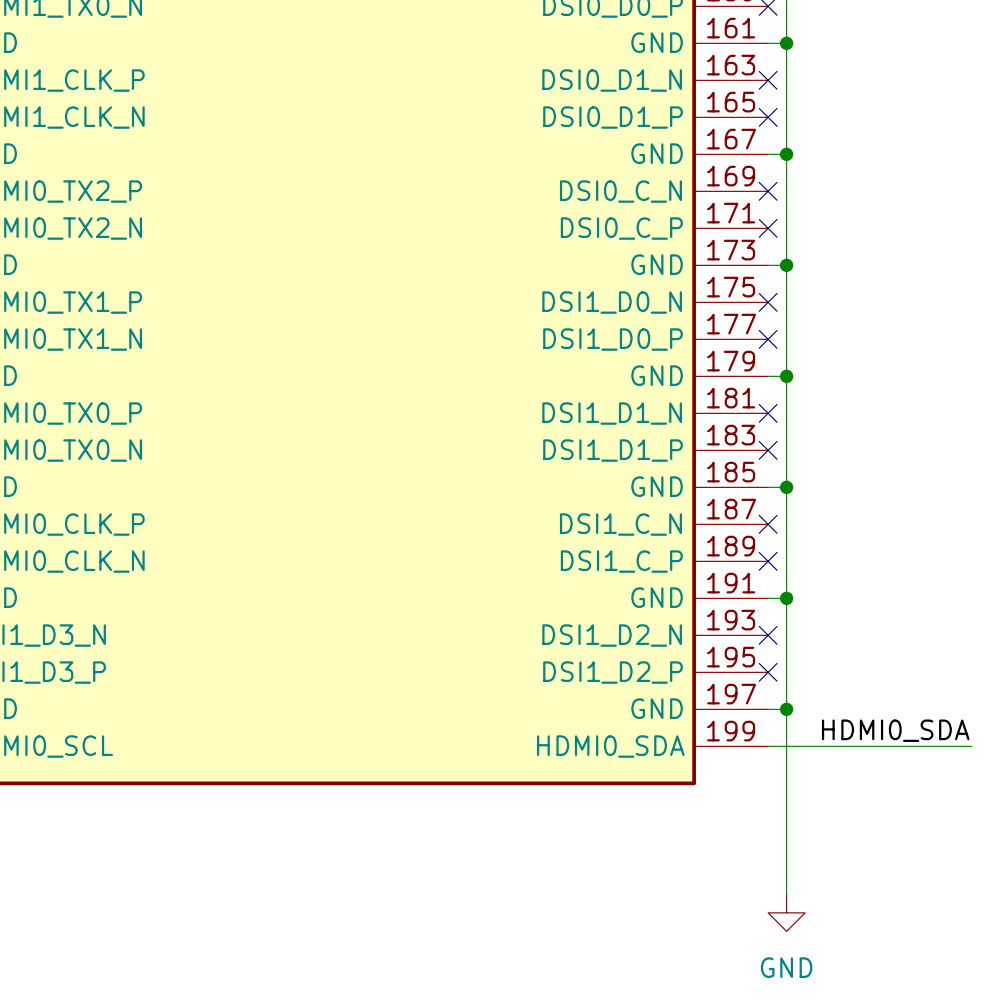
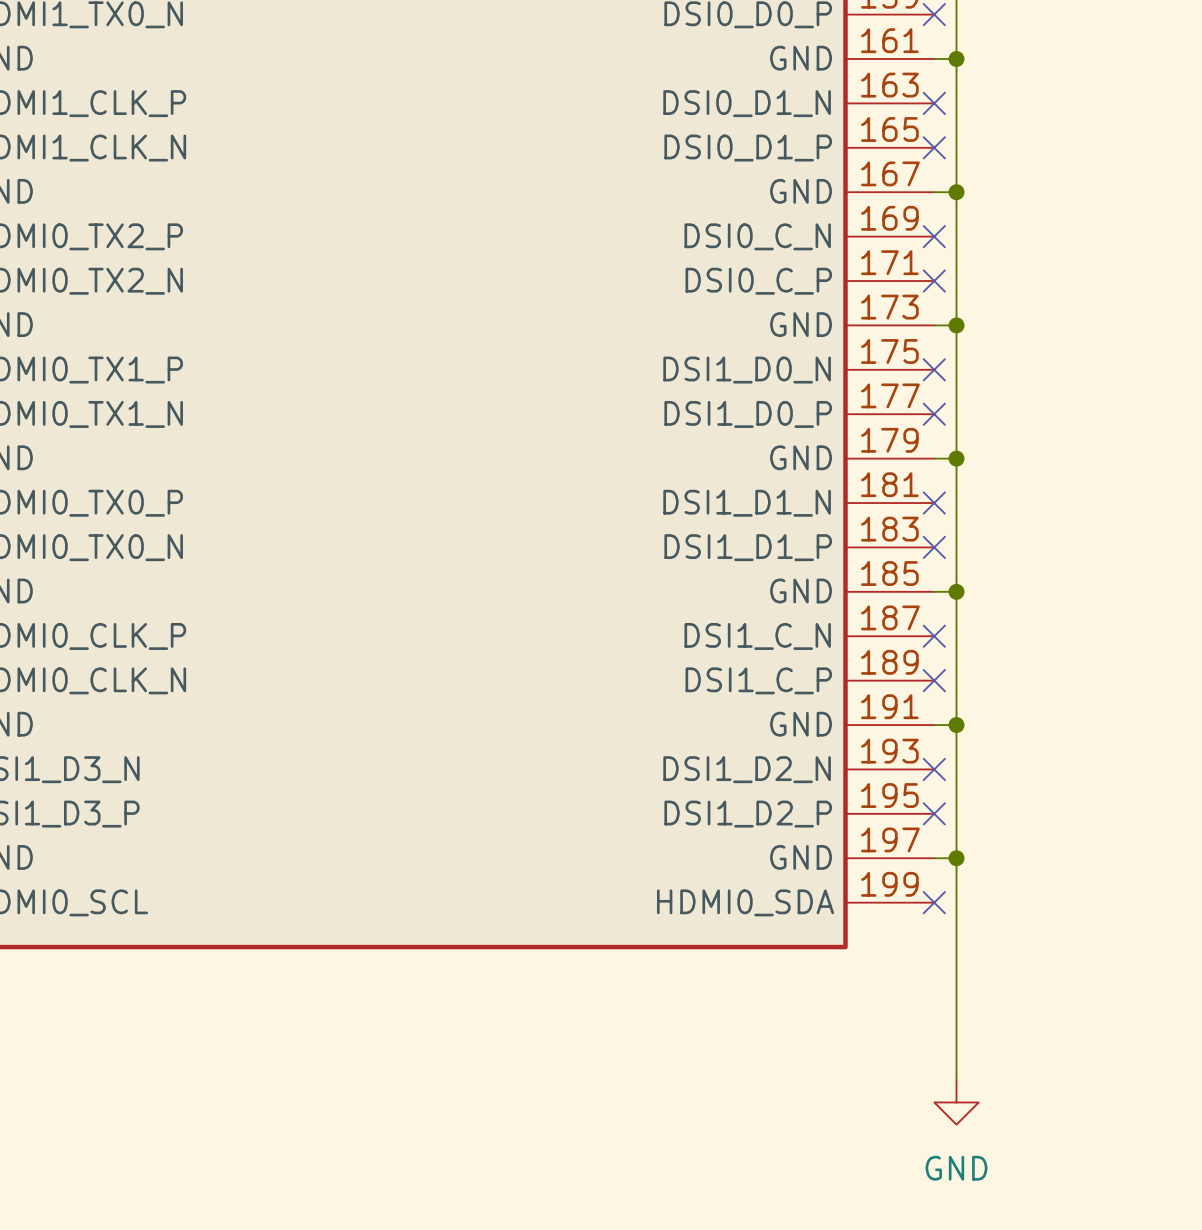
label: HDMI0_SDA (895, 730) -> none
wire: (768, 746) (971, 746) -> none
no-connect mark: none -> (934, 902)

